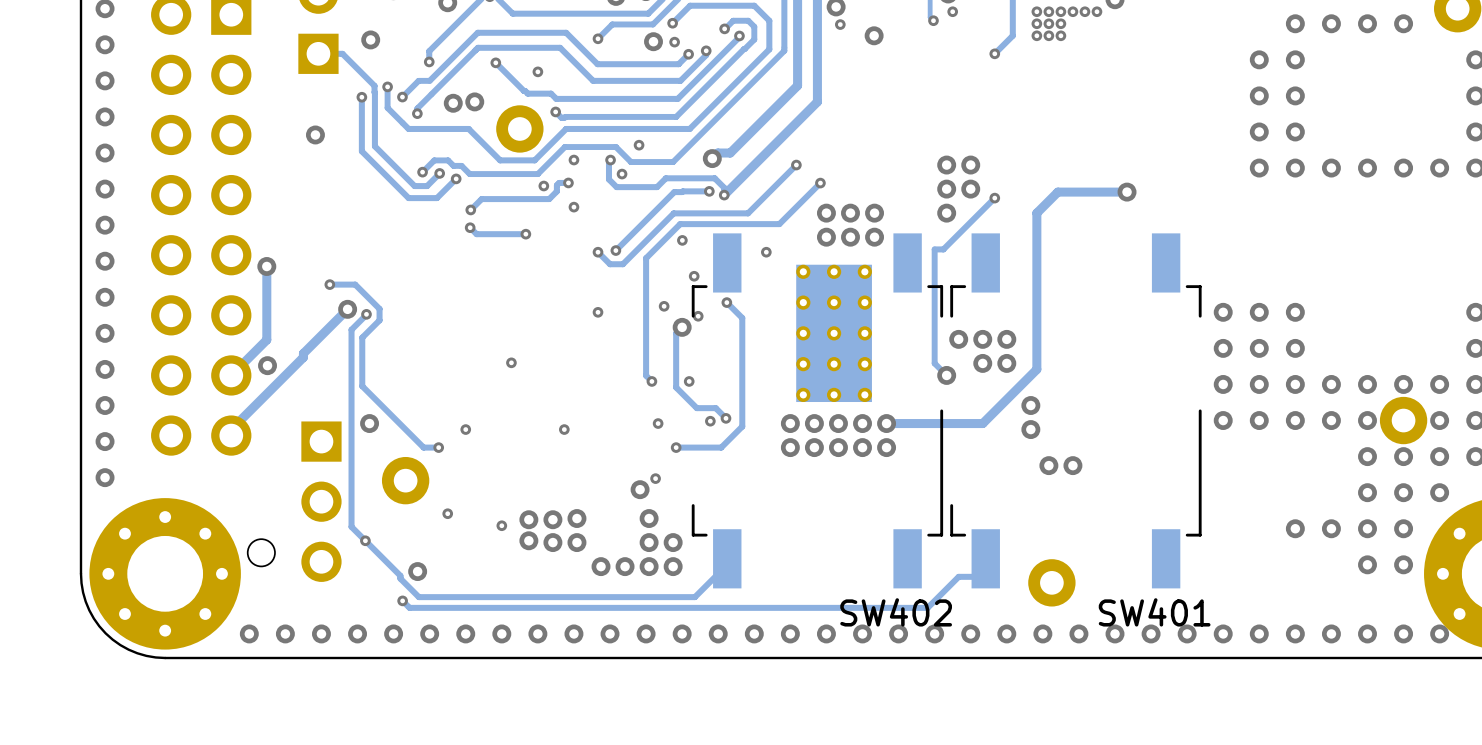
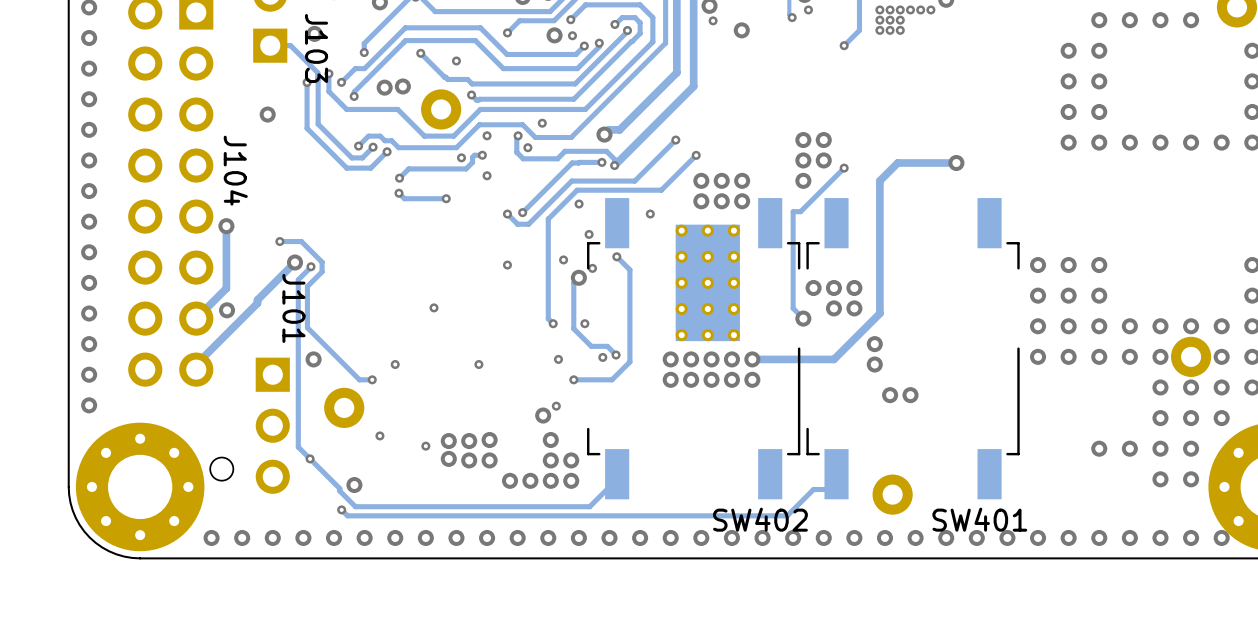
J103 name: none -> J103 (316, 48)
J104 name: none -> J104 (235, 170)
J101 name: none -> J101 (293, 308)

